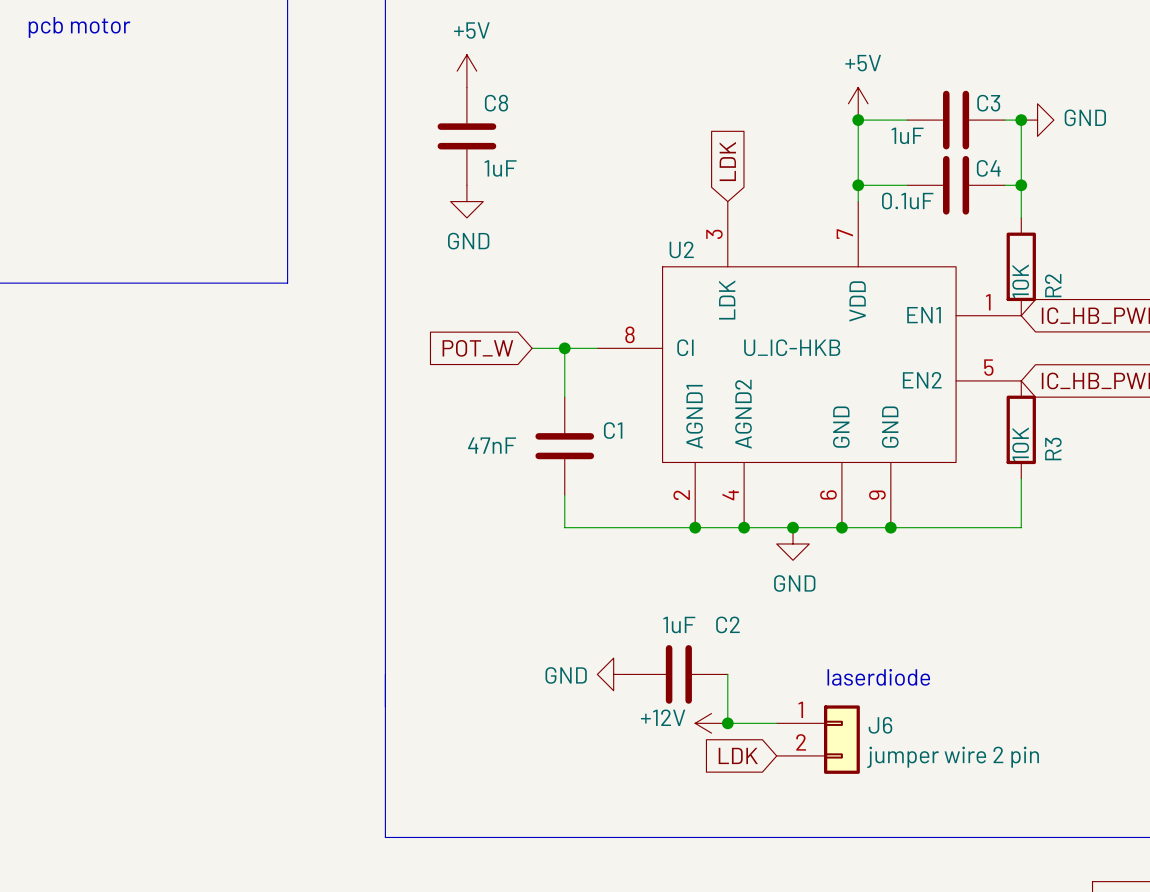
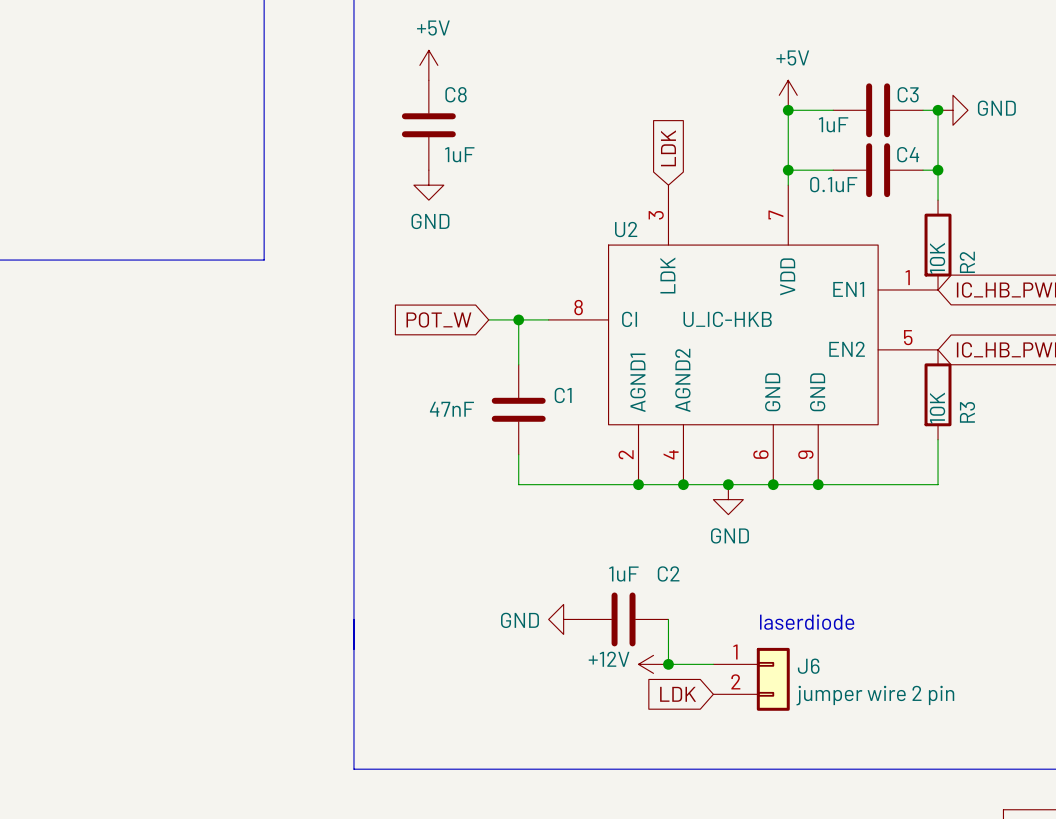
text: pcb motor (79, 27) -> none

